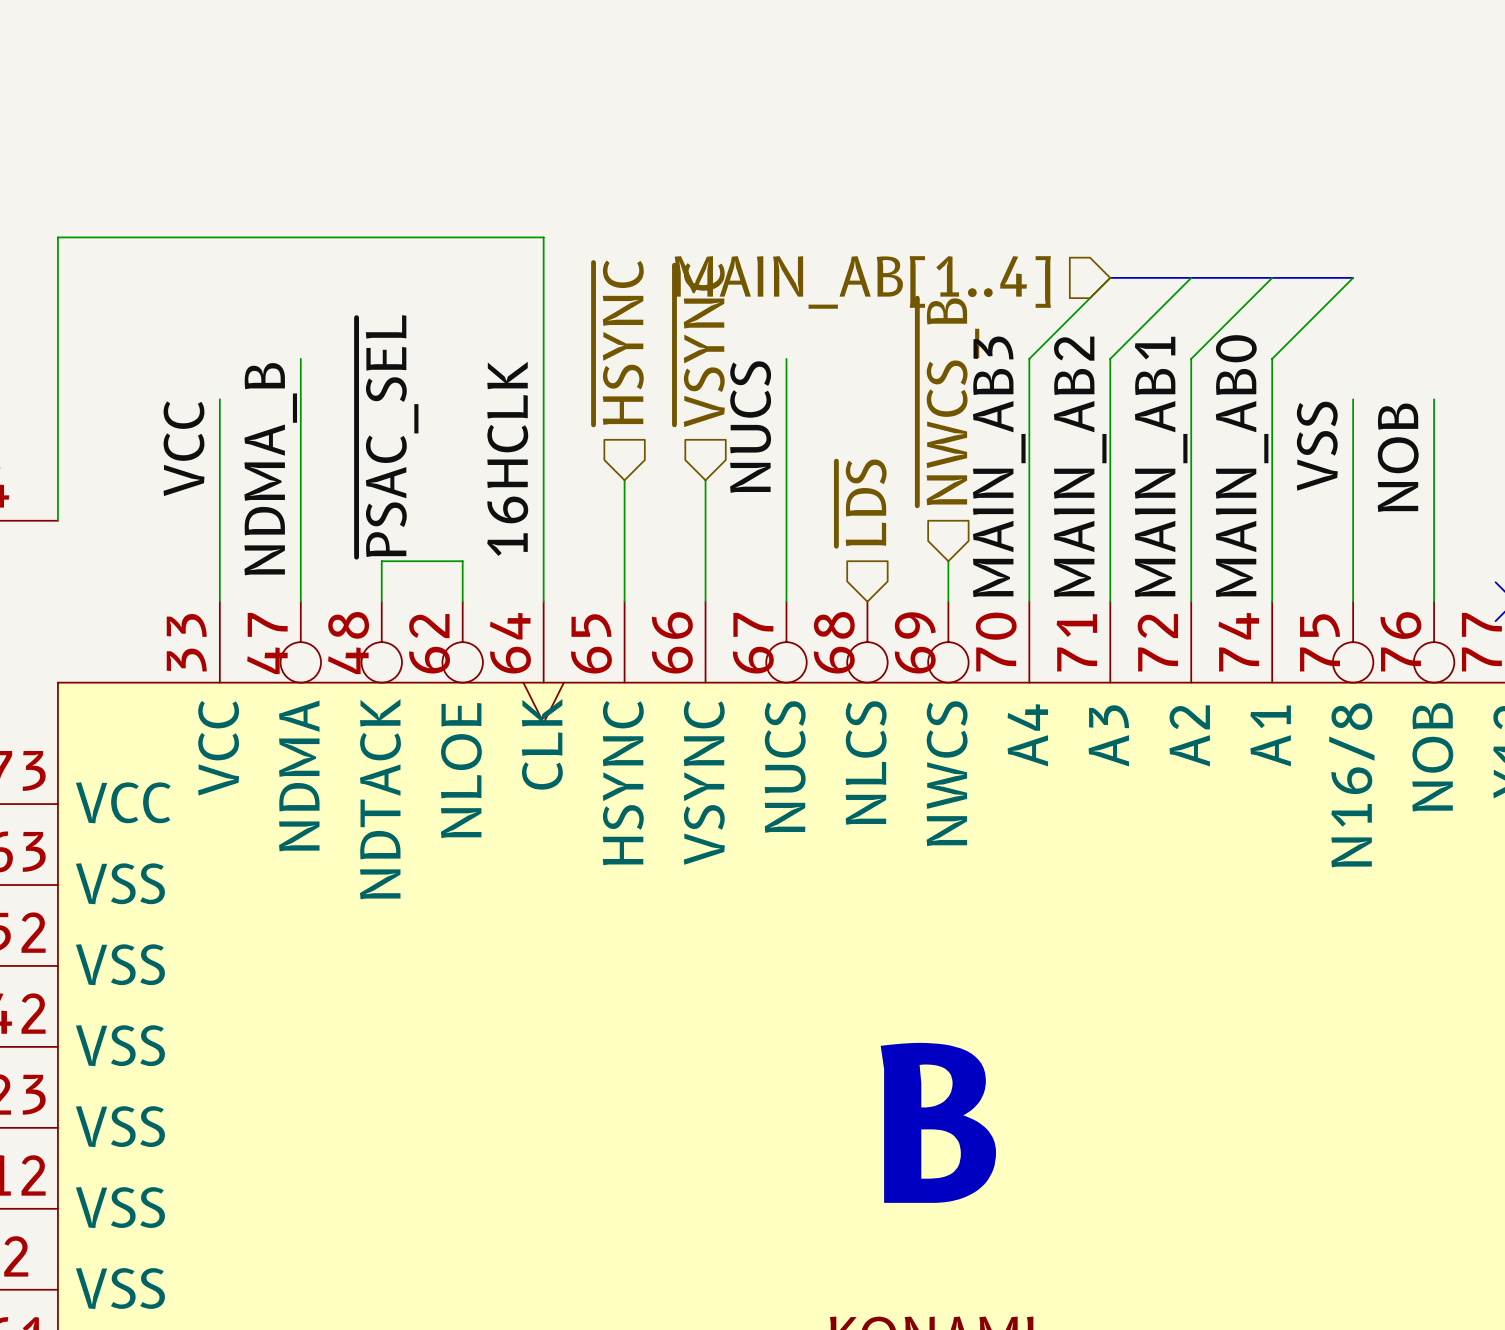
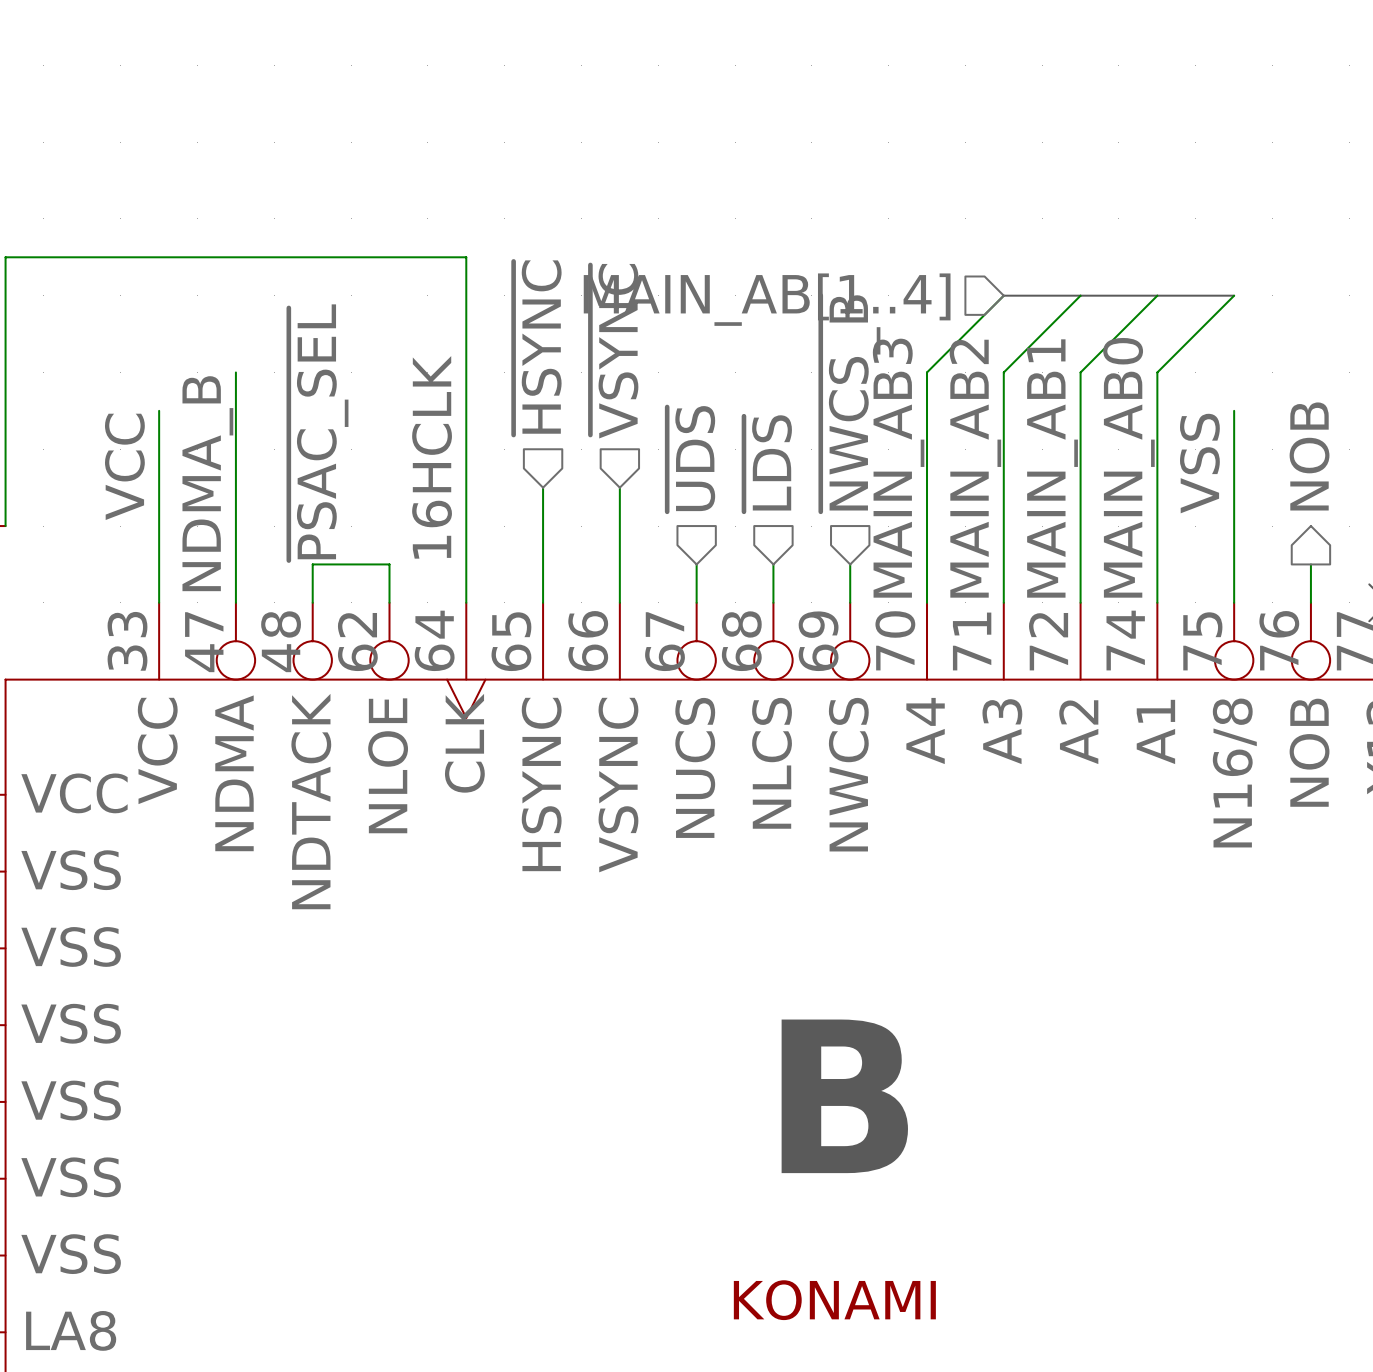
wire: (786, 358) (786, 561) -> none
wire: (1434, 399) (1434, 561) -> none
label: NUCS (750, 427) -> none
hierarchical label: none -> NOB (1309, 456)
label: NOB (1398, 457) -> none
hierarchical label: none -> ~{UDS} (691, 458)
hierarchical label position: ~{LDS} (861, 502) -> ~{LDS} (767, 463)
wire: none -> (773, 564) (773, 602)

